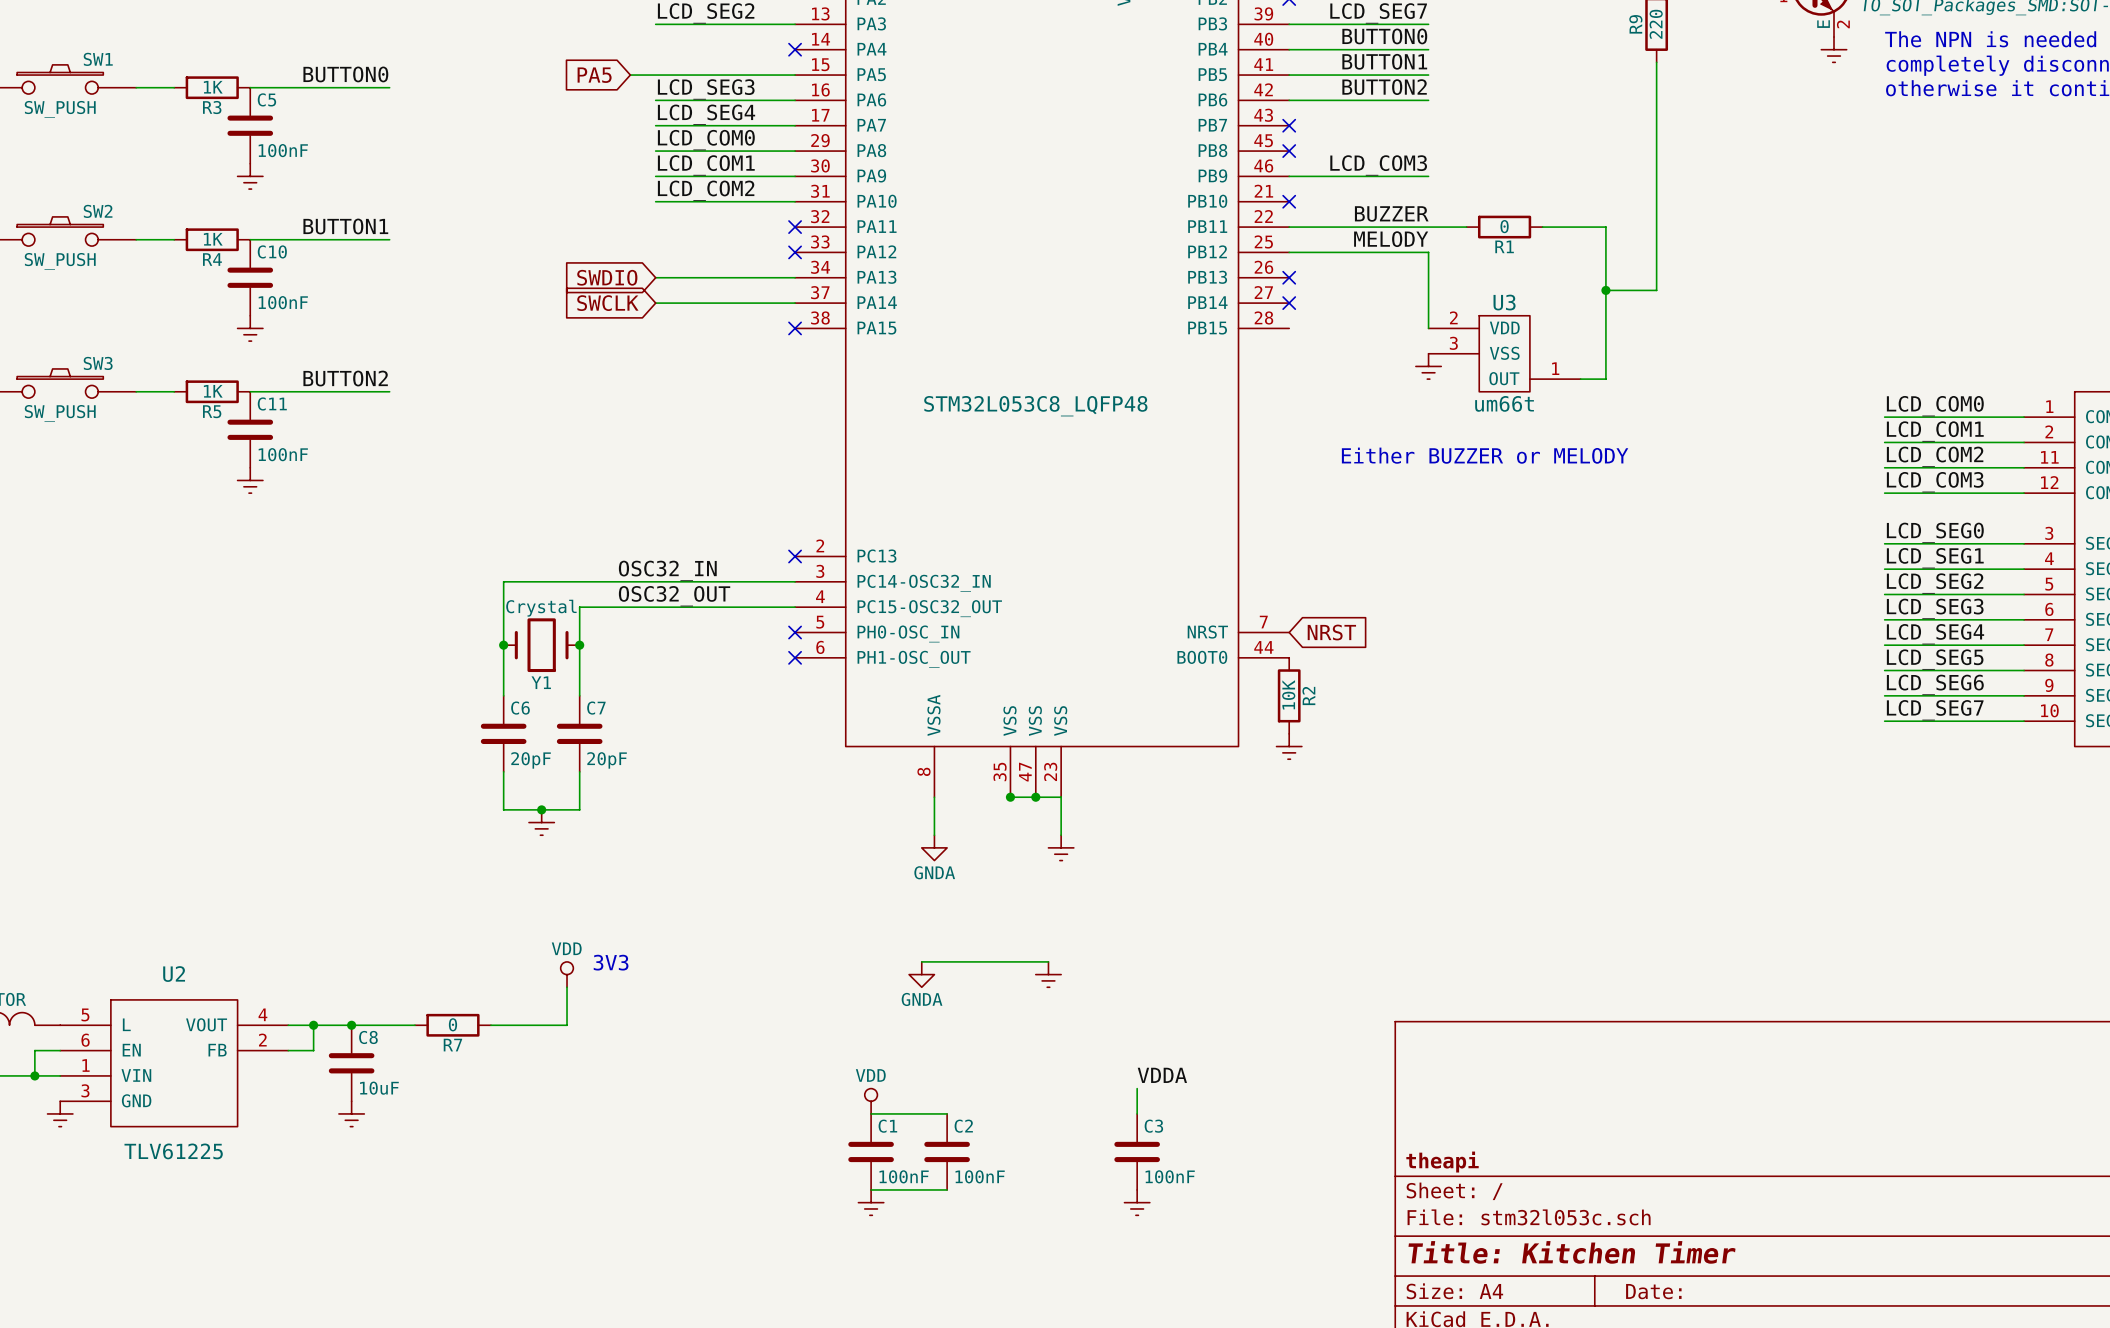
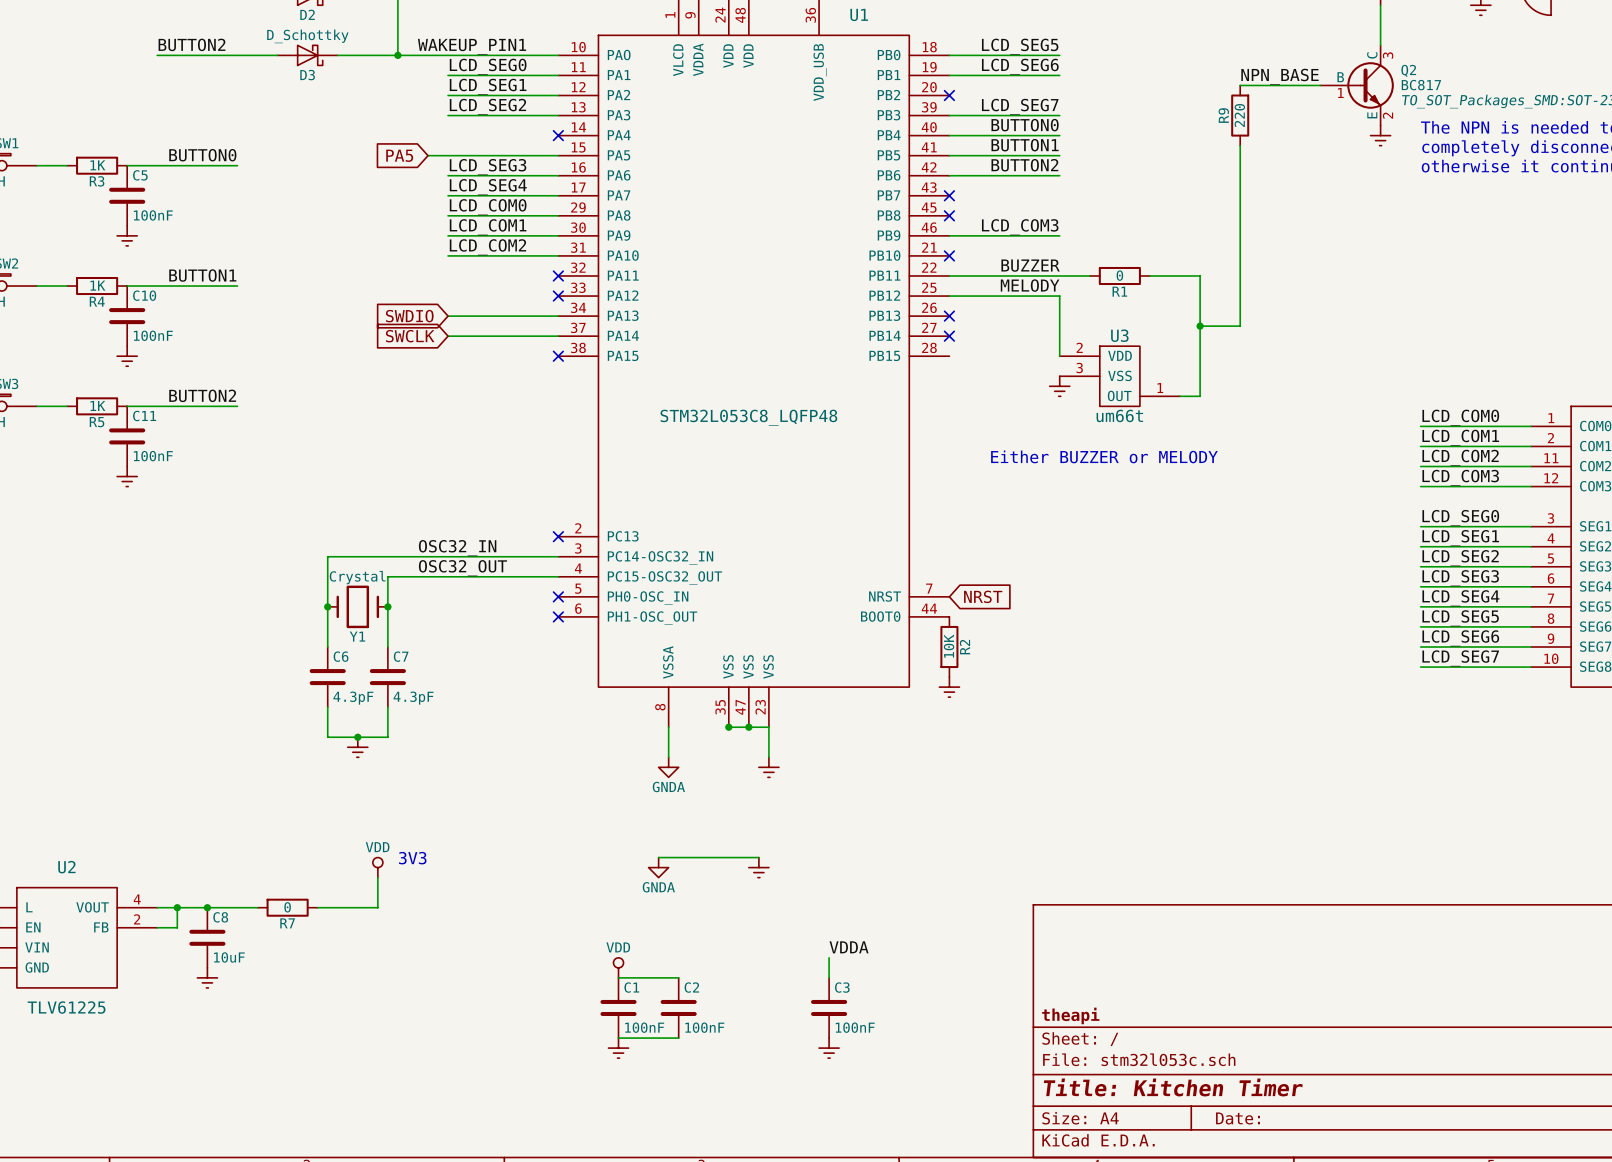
C6 value: 20pF (531, 760) -> 4.3pF (353, 698)
C7 value: 20pF (607, 760) -> 4.3pF (413, 698)

